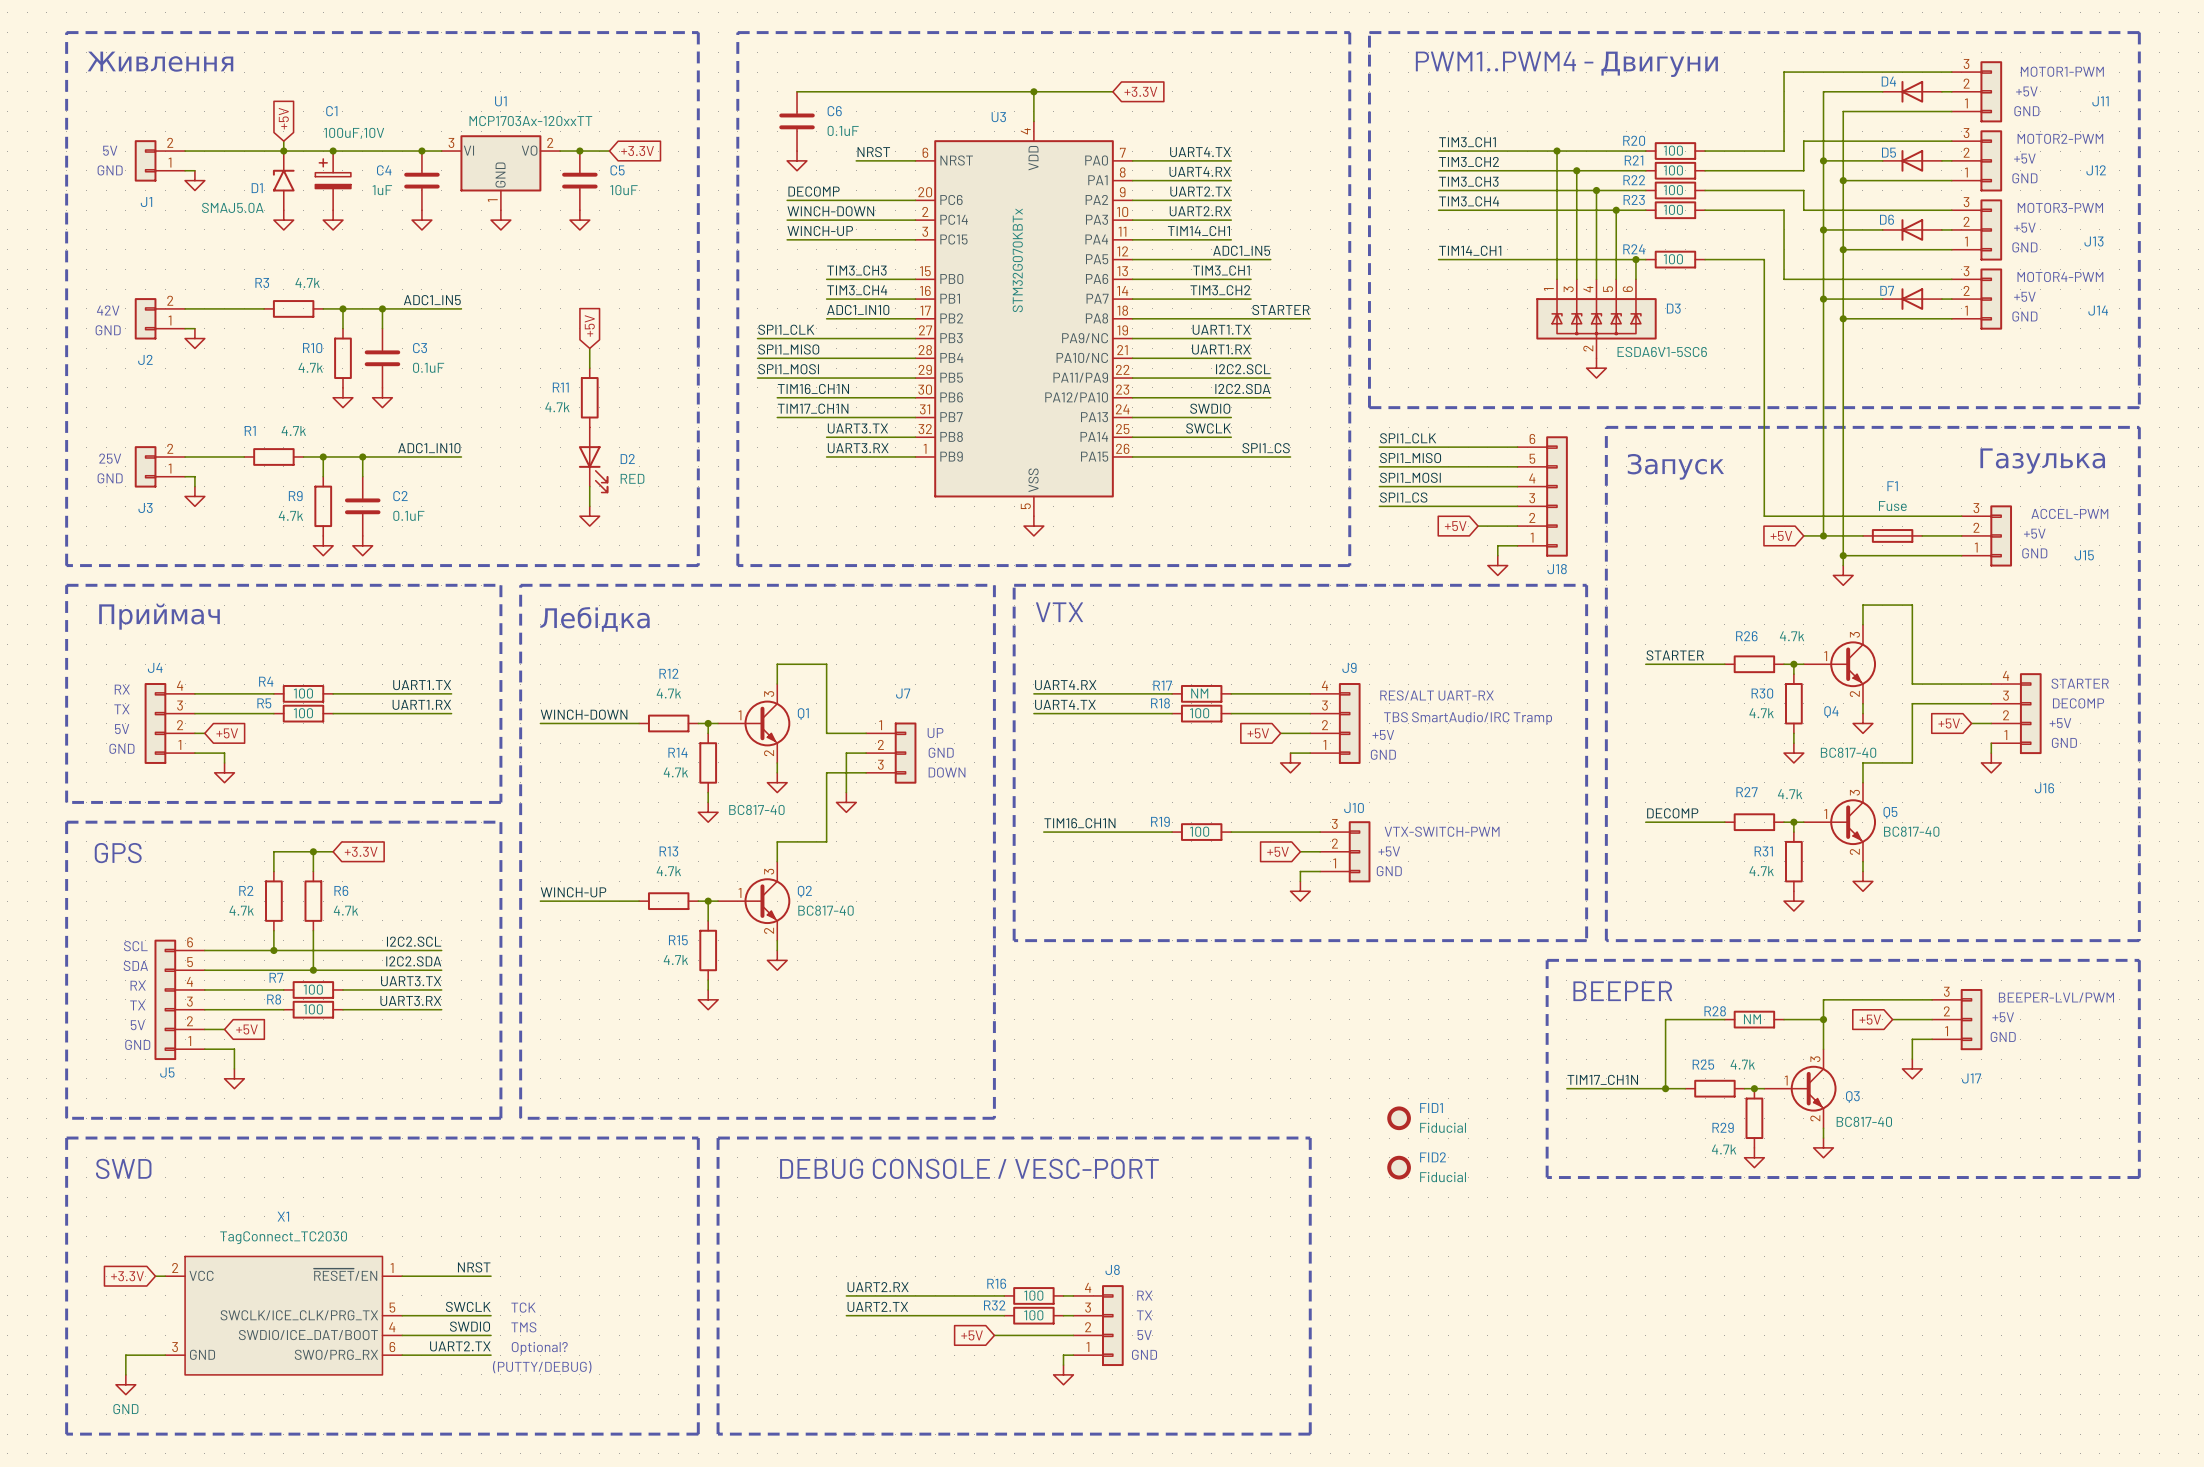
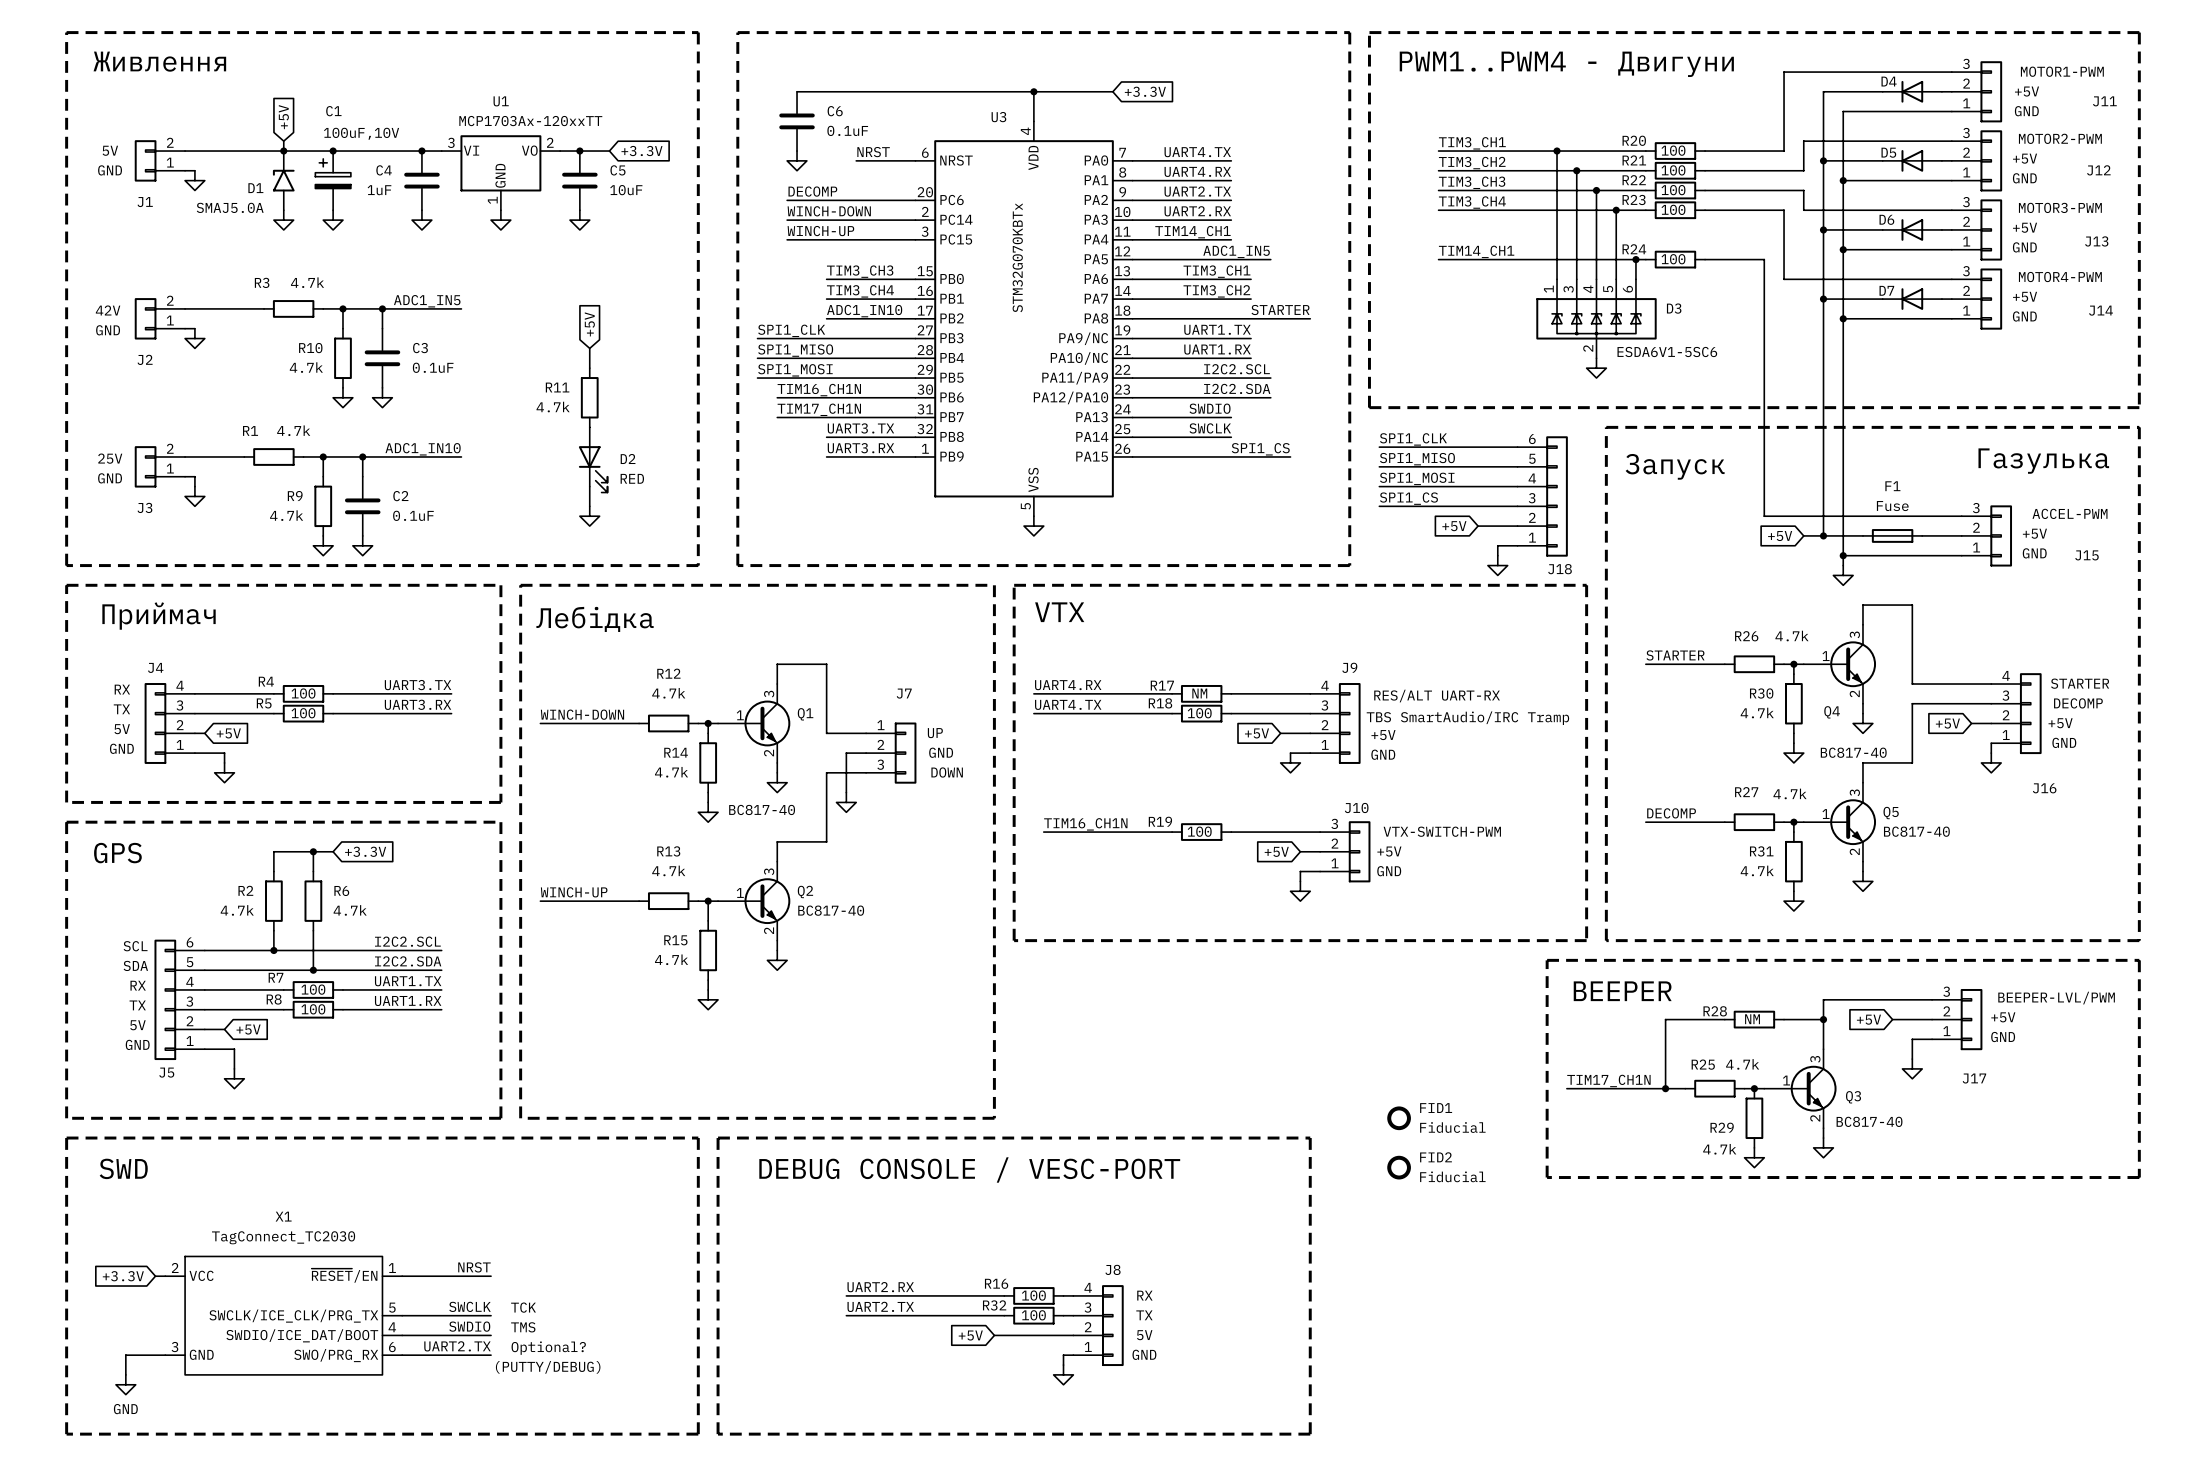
label: UART1.TX (422, 685) -> UART3.TX (418, 685)
label: UART1.RX (421, 704) -> UART3.RX (418, 704)
label: UART3.TX (411, 981) -> UART1.TX (408, 981)
label: UART3.RX (410, 1000) -> UART1.RX (408, 1000)

